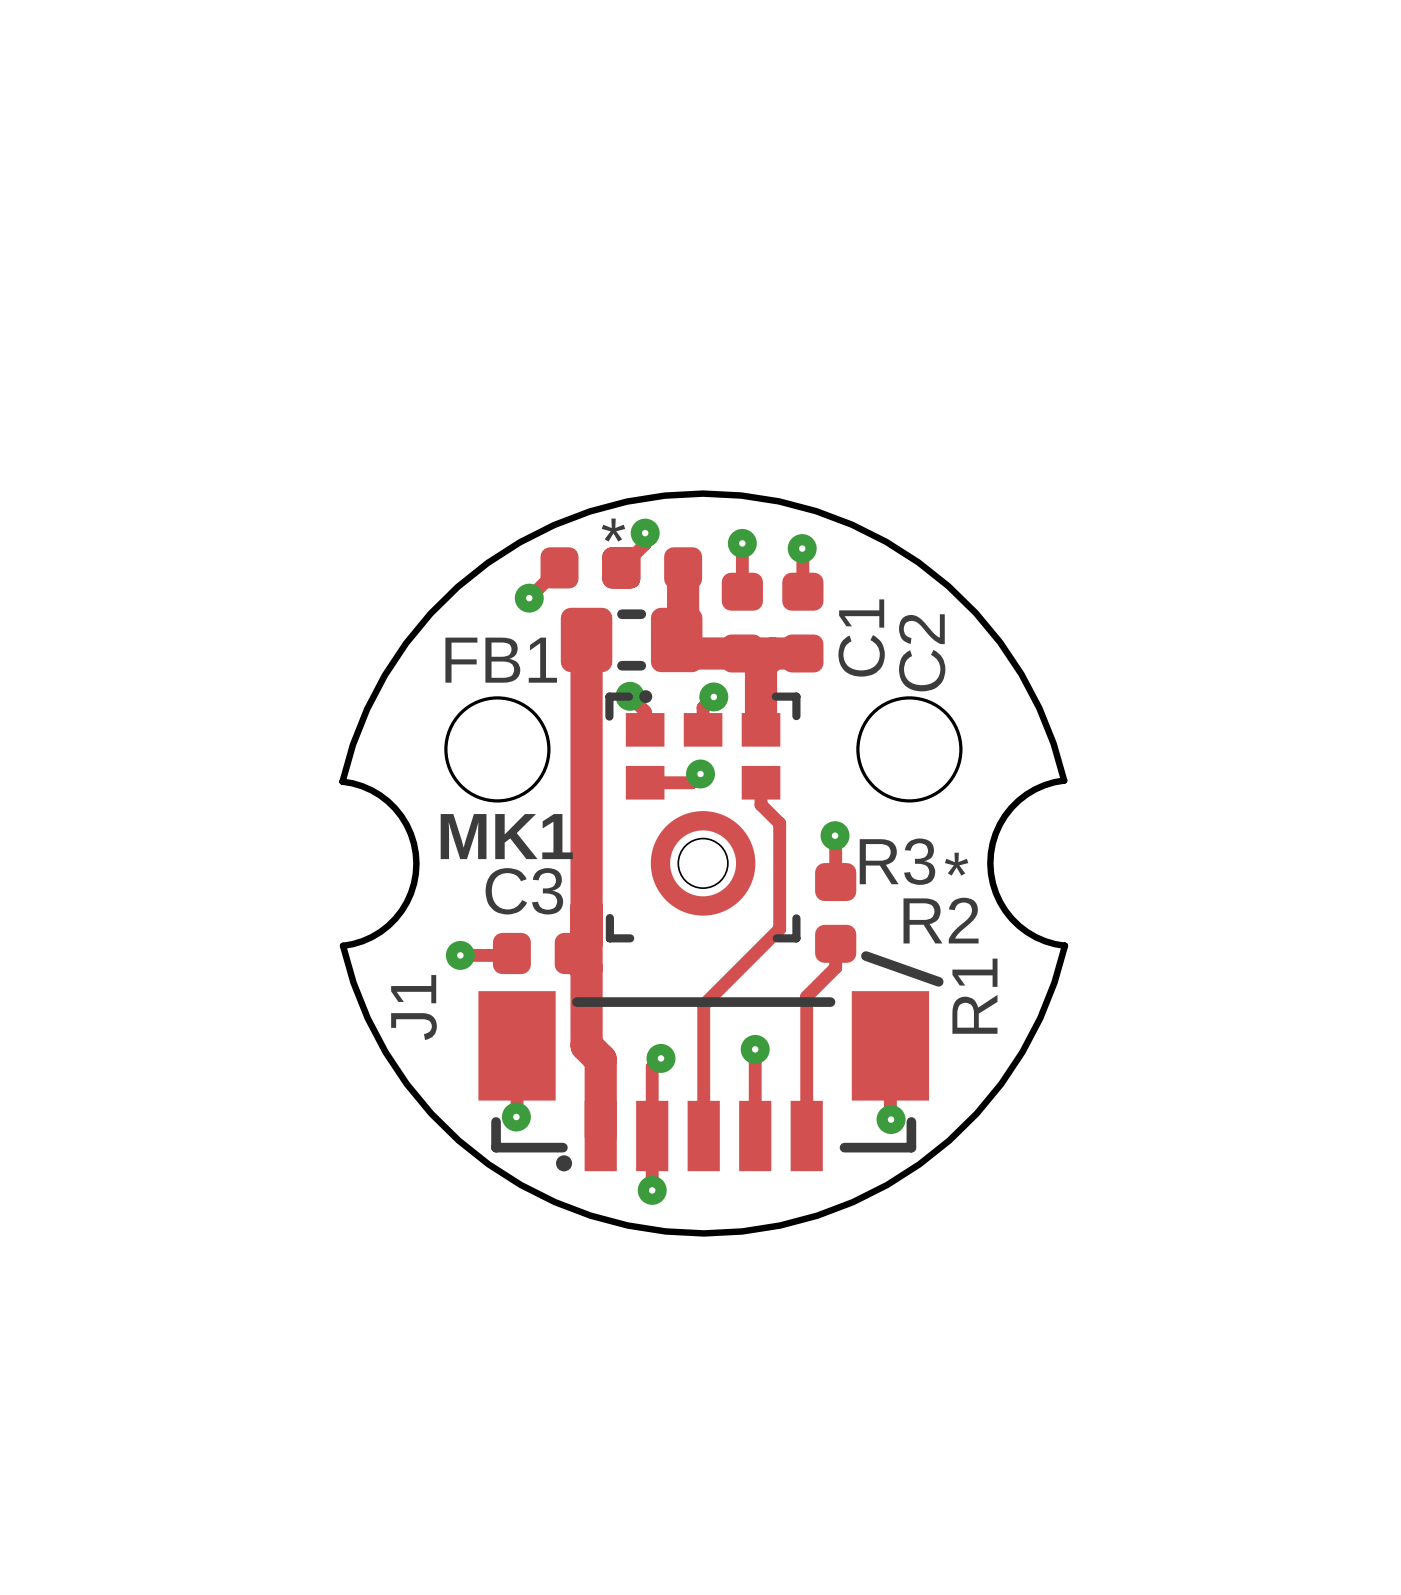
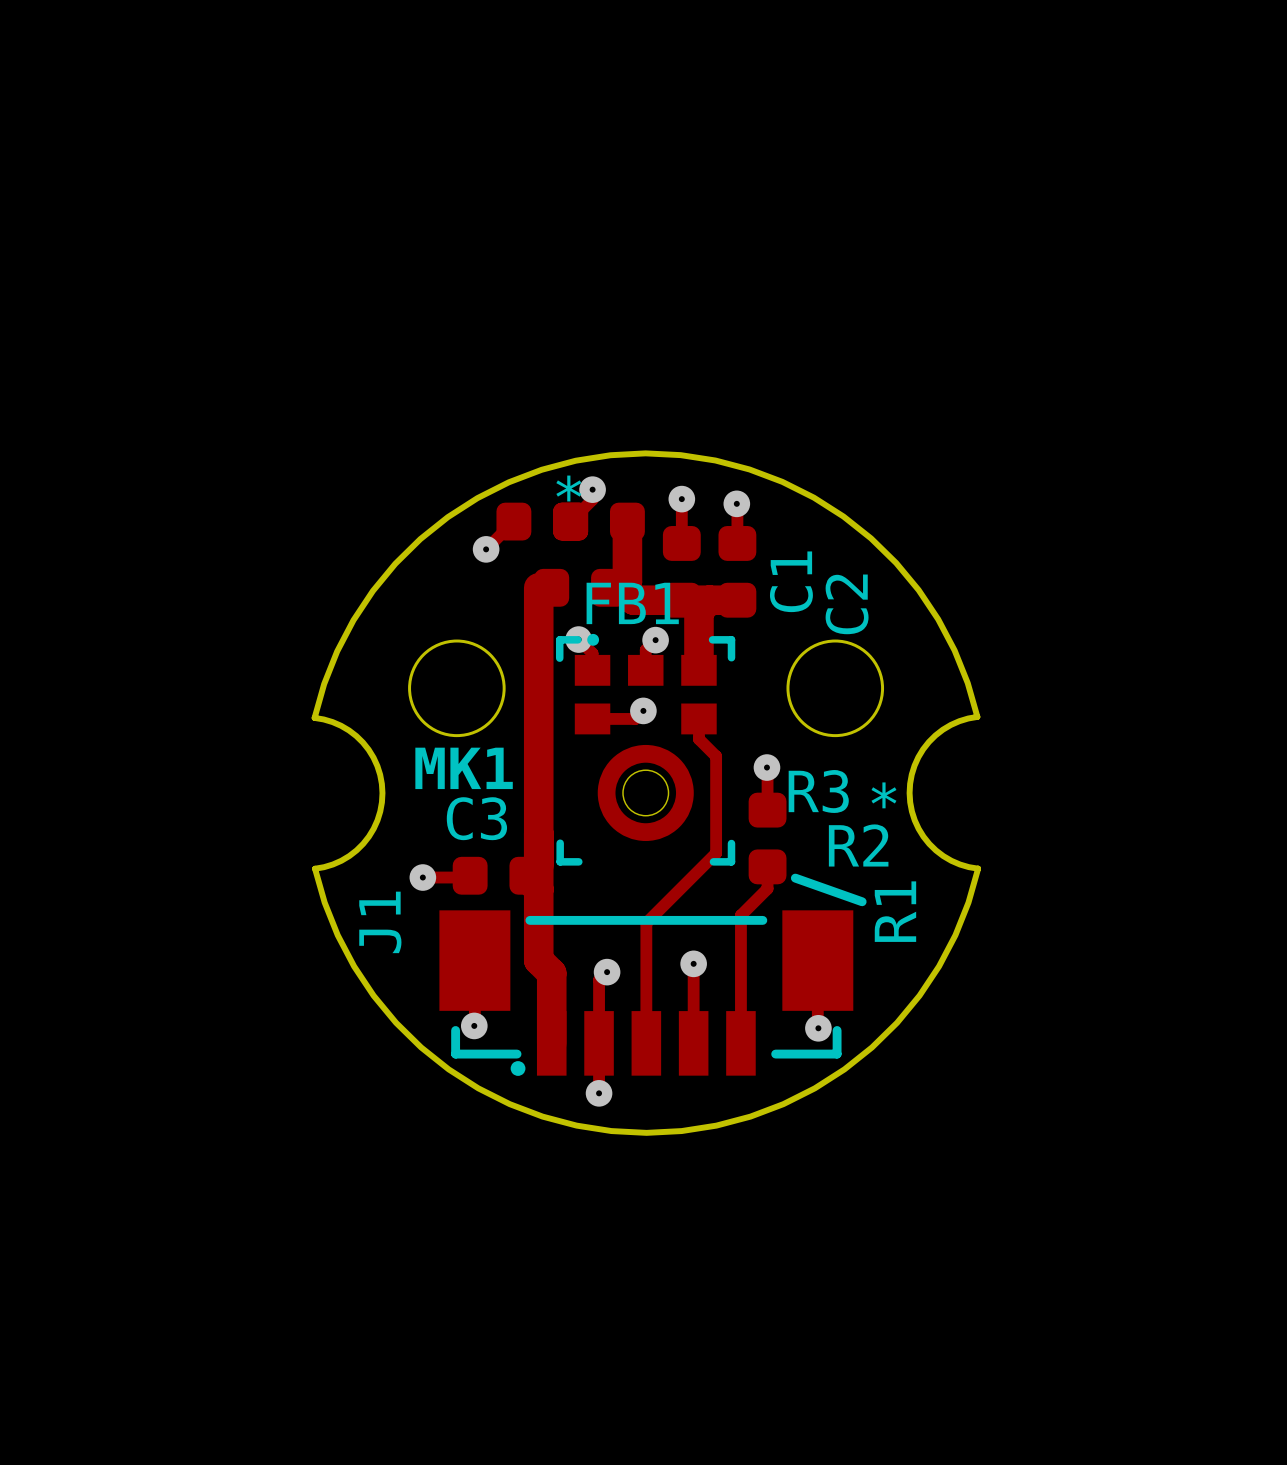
FB1 footprint: [560, 607, 703, 673] -> [534, 568, 626, 607]
FB1 name position: FB1 (501, 660) -> FB1 (632, 603)

